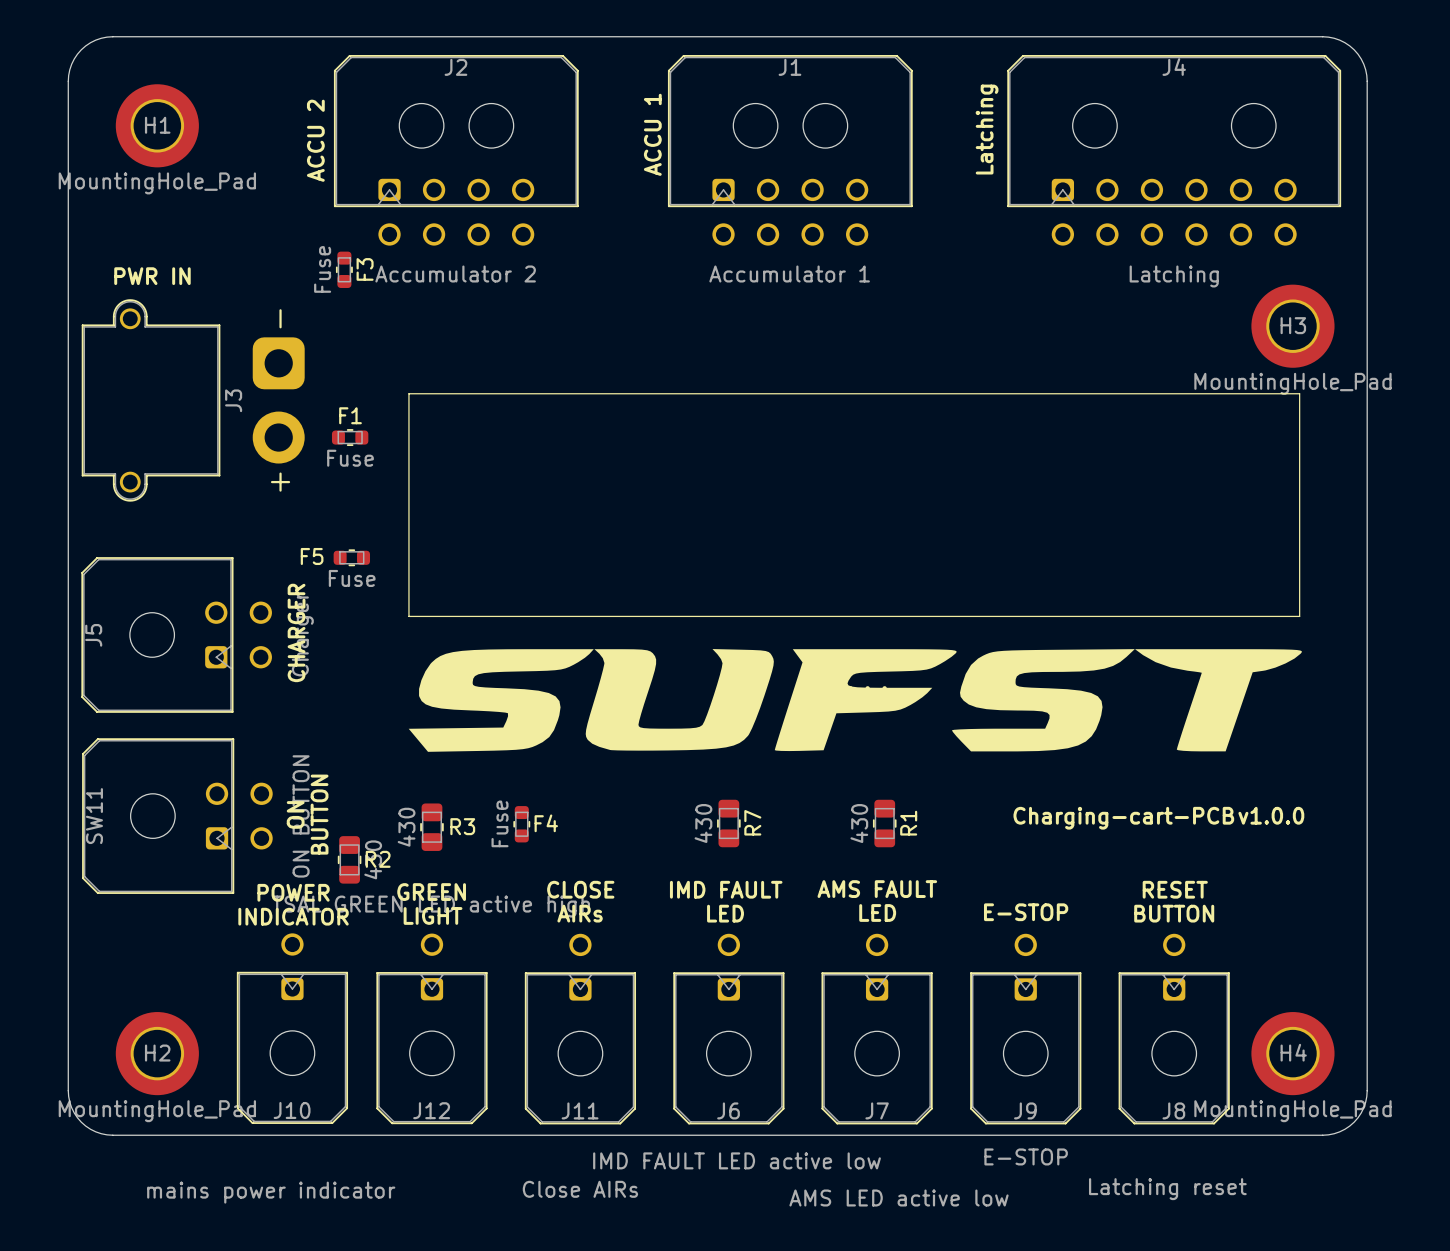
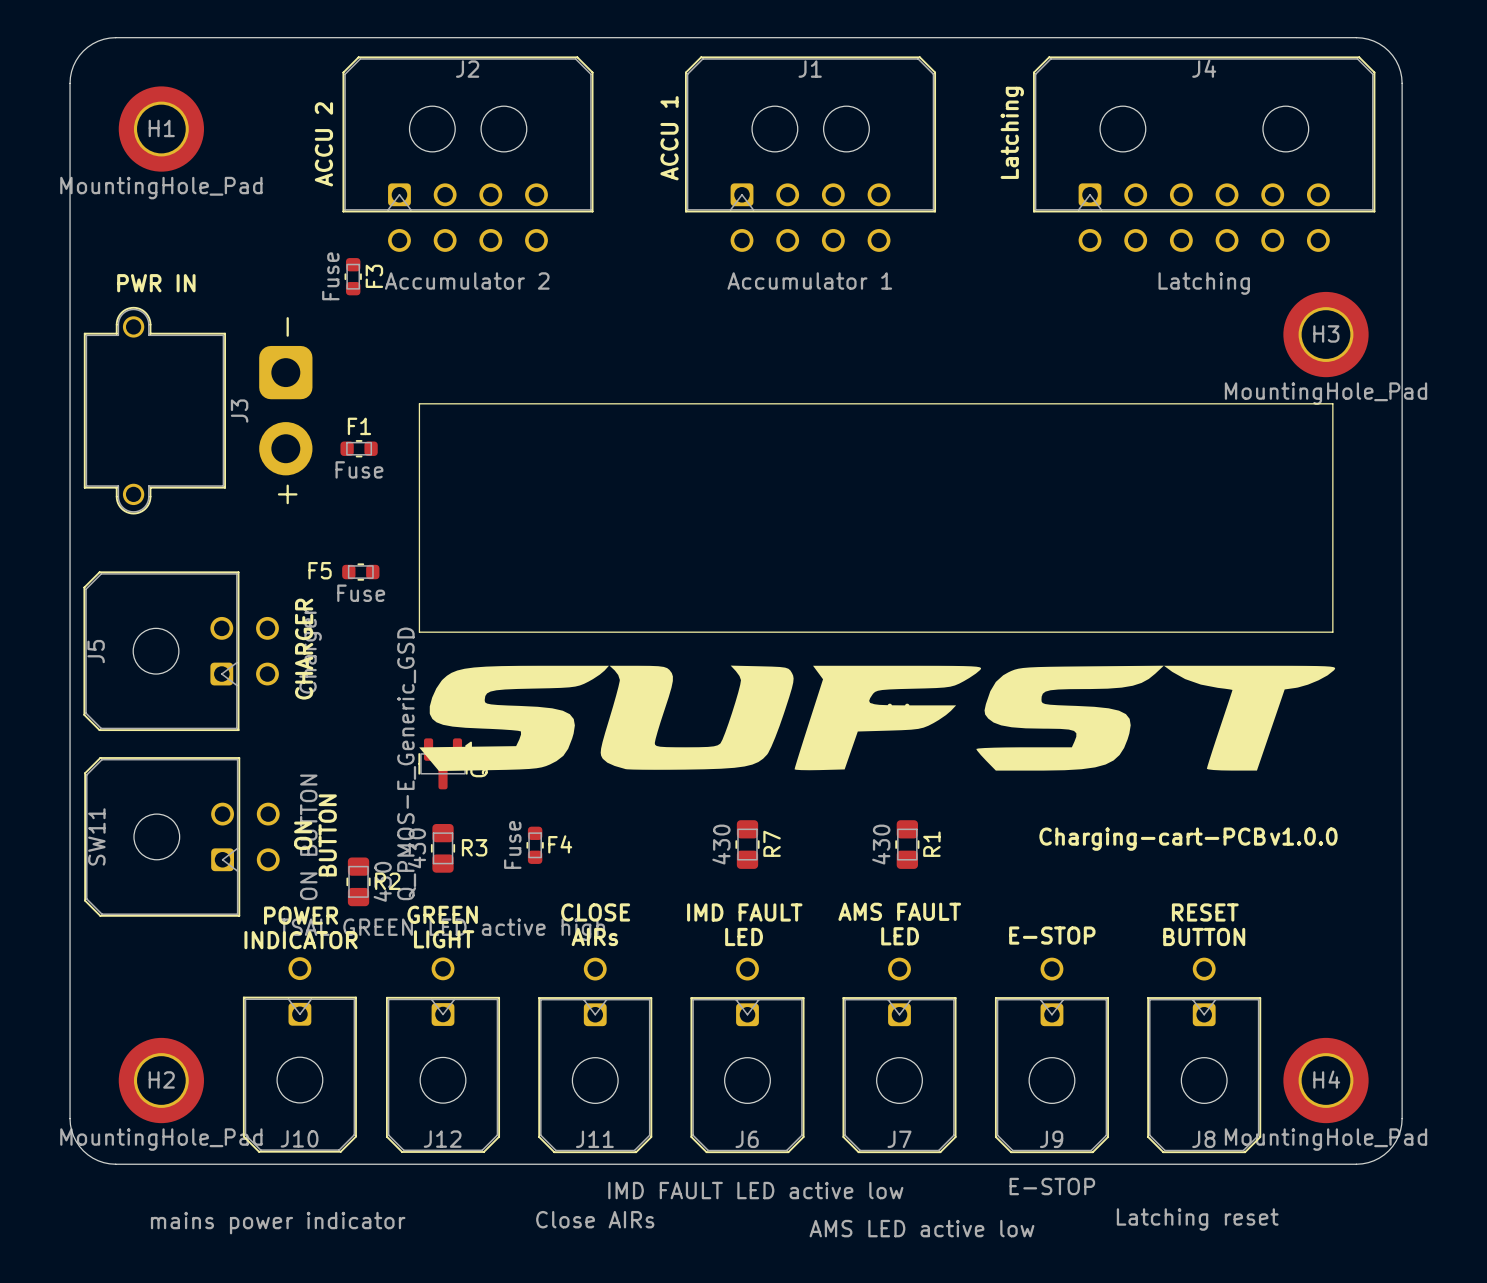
part: none -> Q_PMOS-E_Generic_GSD (445, 763)

